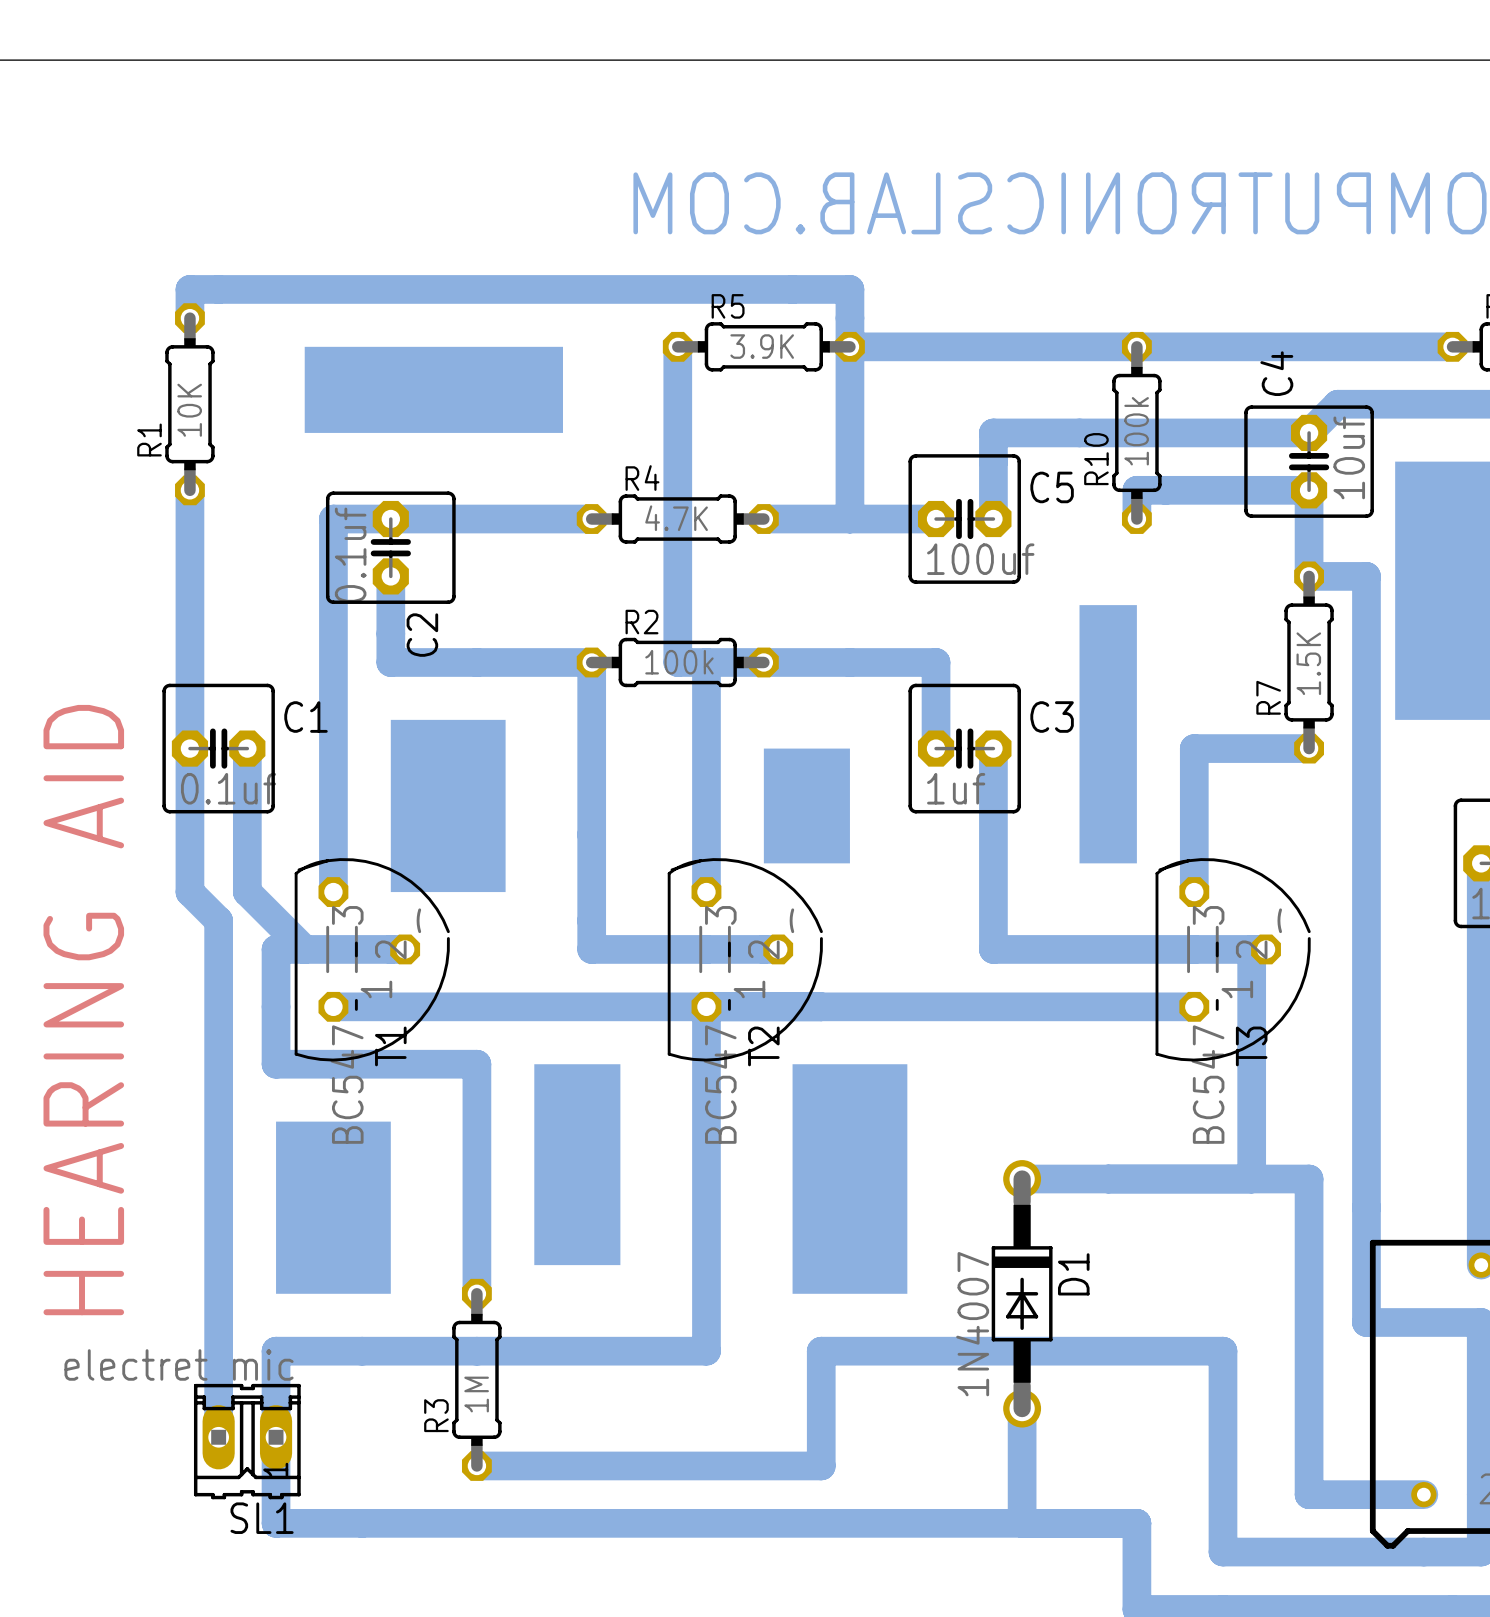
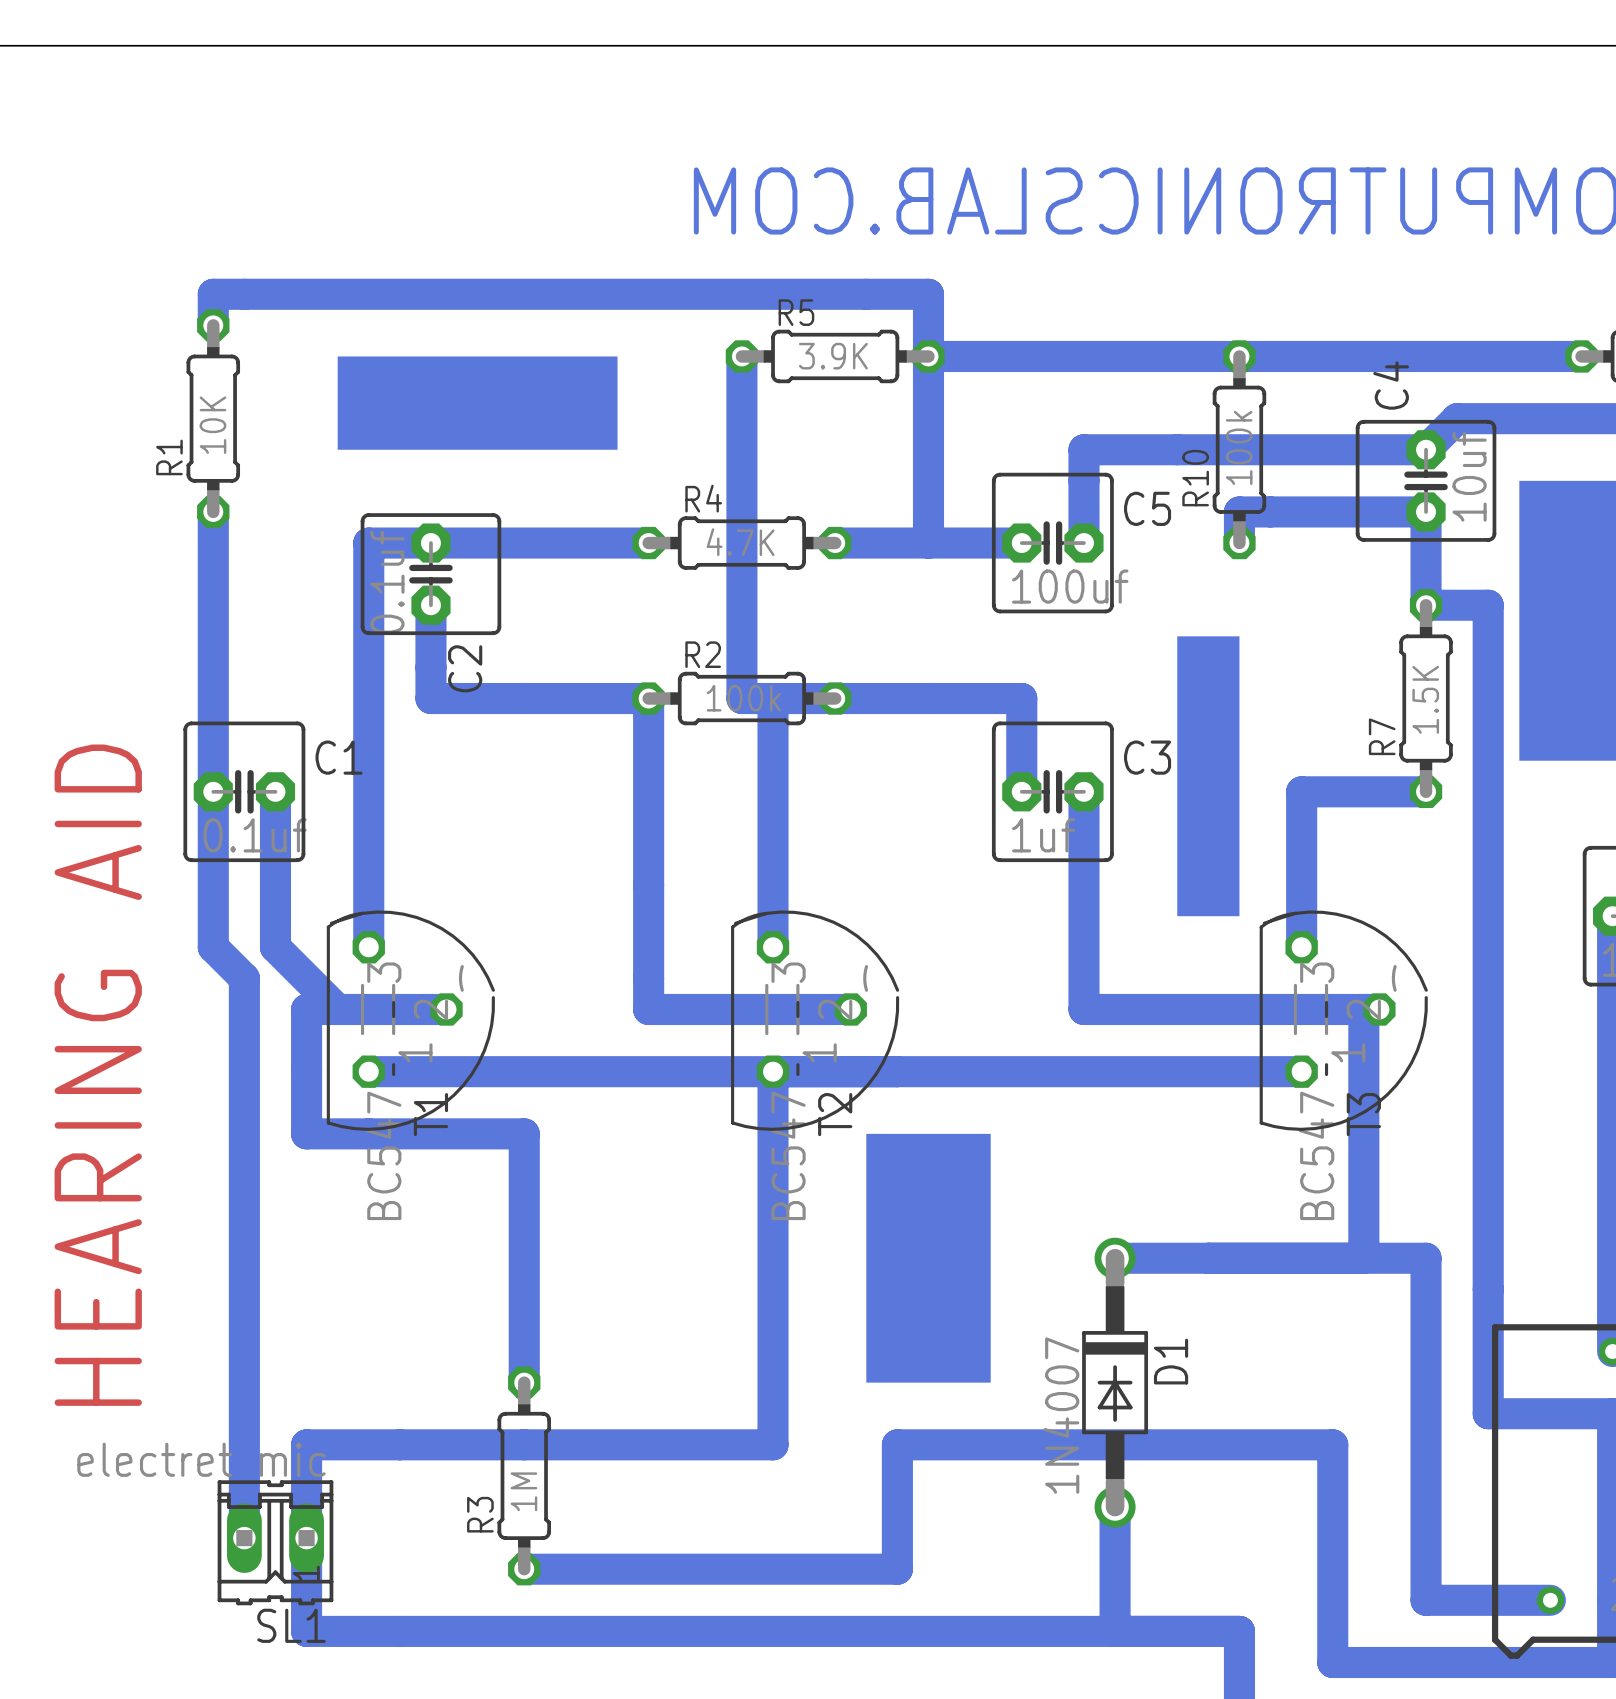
drawing: [390, 719, 506, 893] -> none
drawing: [763, 748, 850, 864] -> none
drawing: [534, 1064, 621, 1266] -> none
drawing: [276, 1121, 391, 1294] -> none

